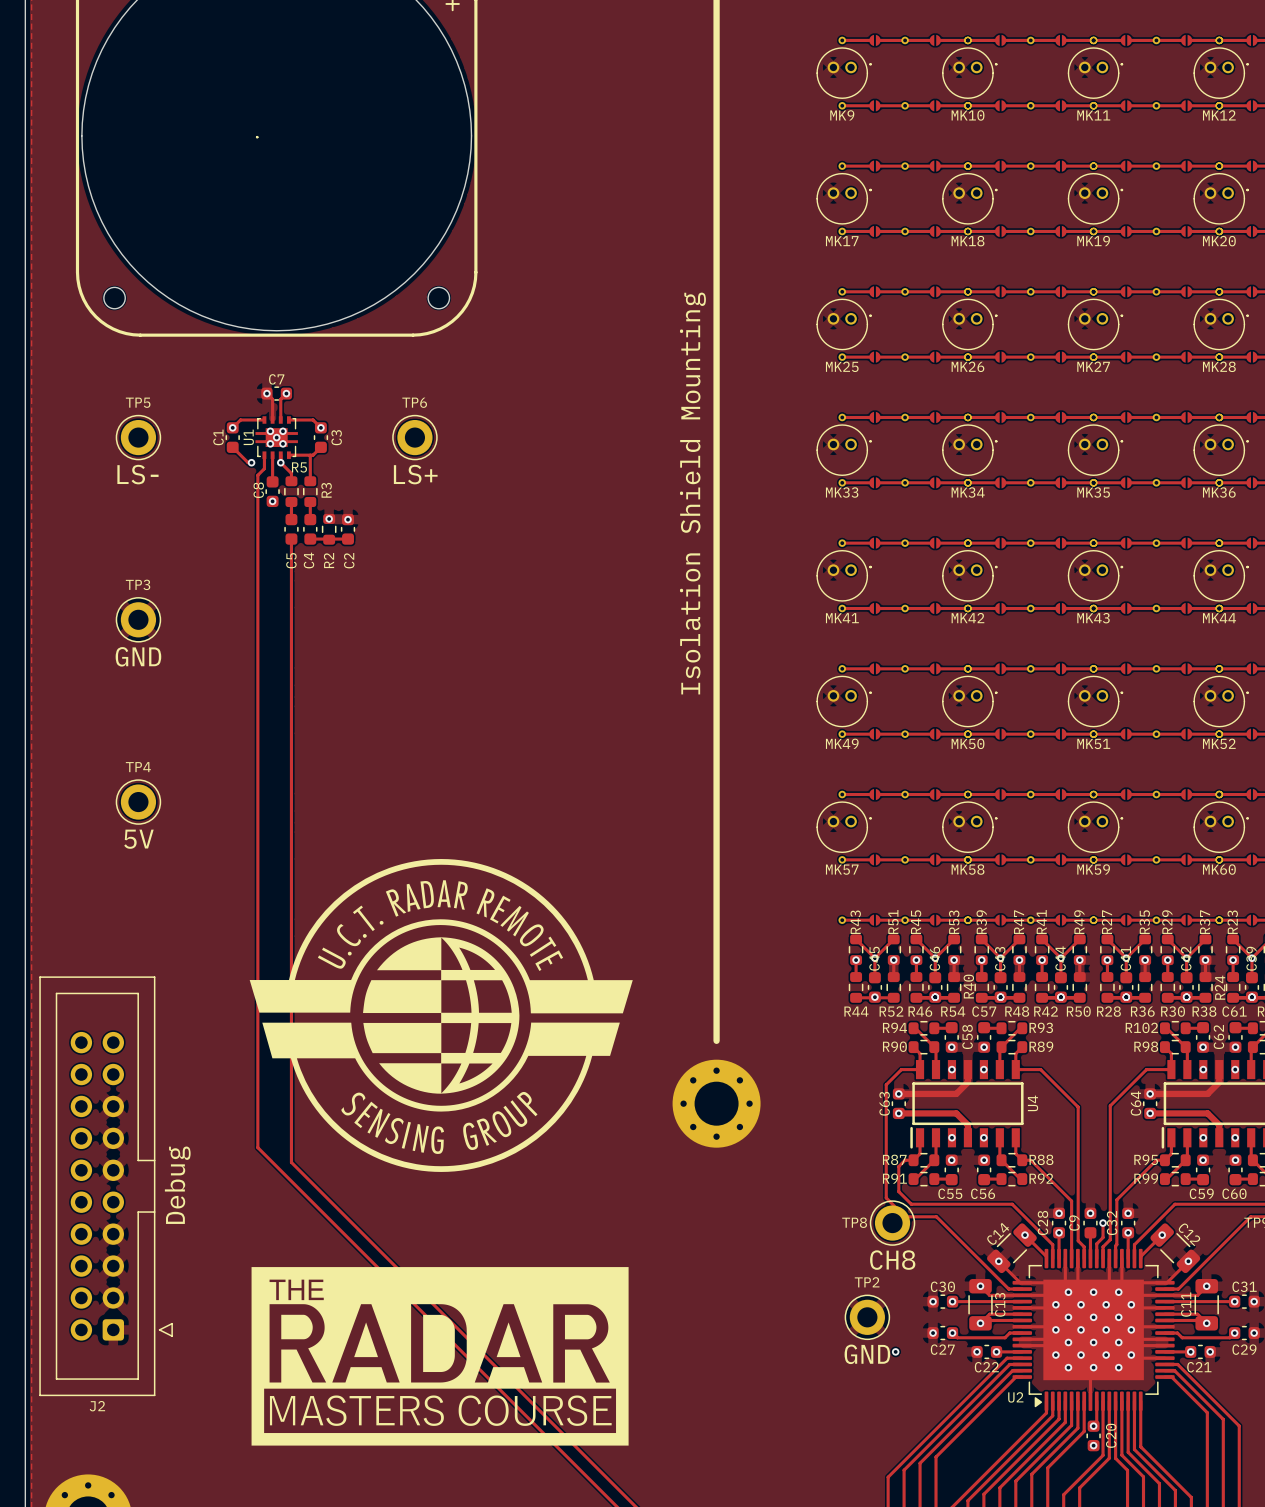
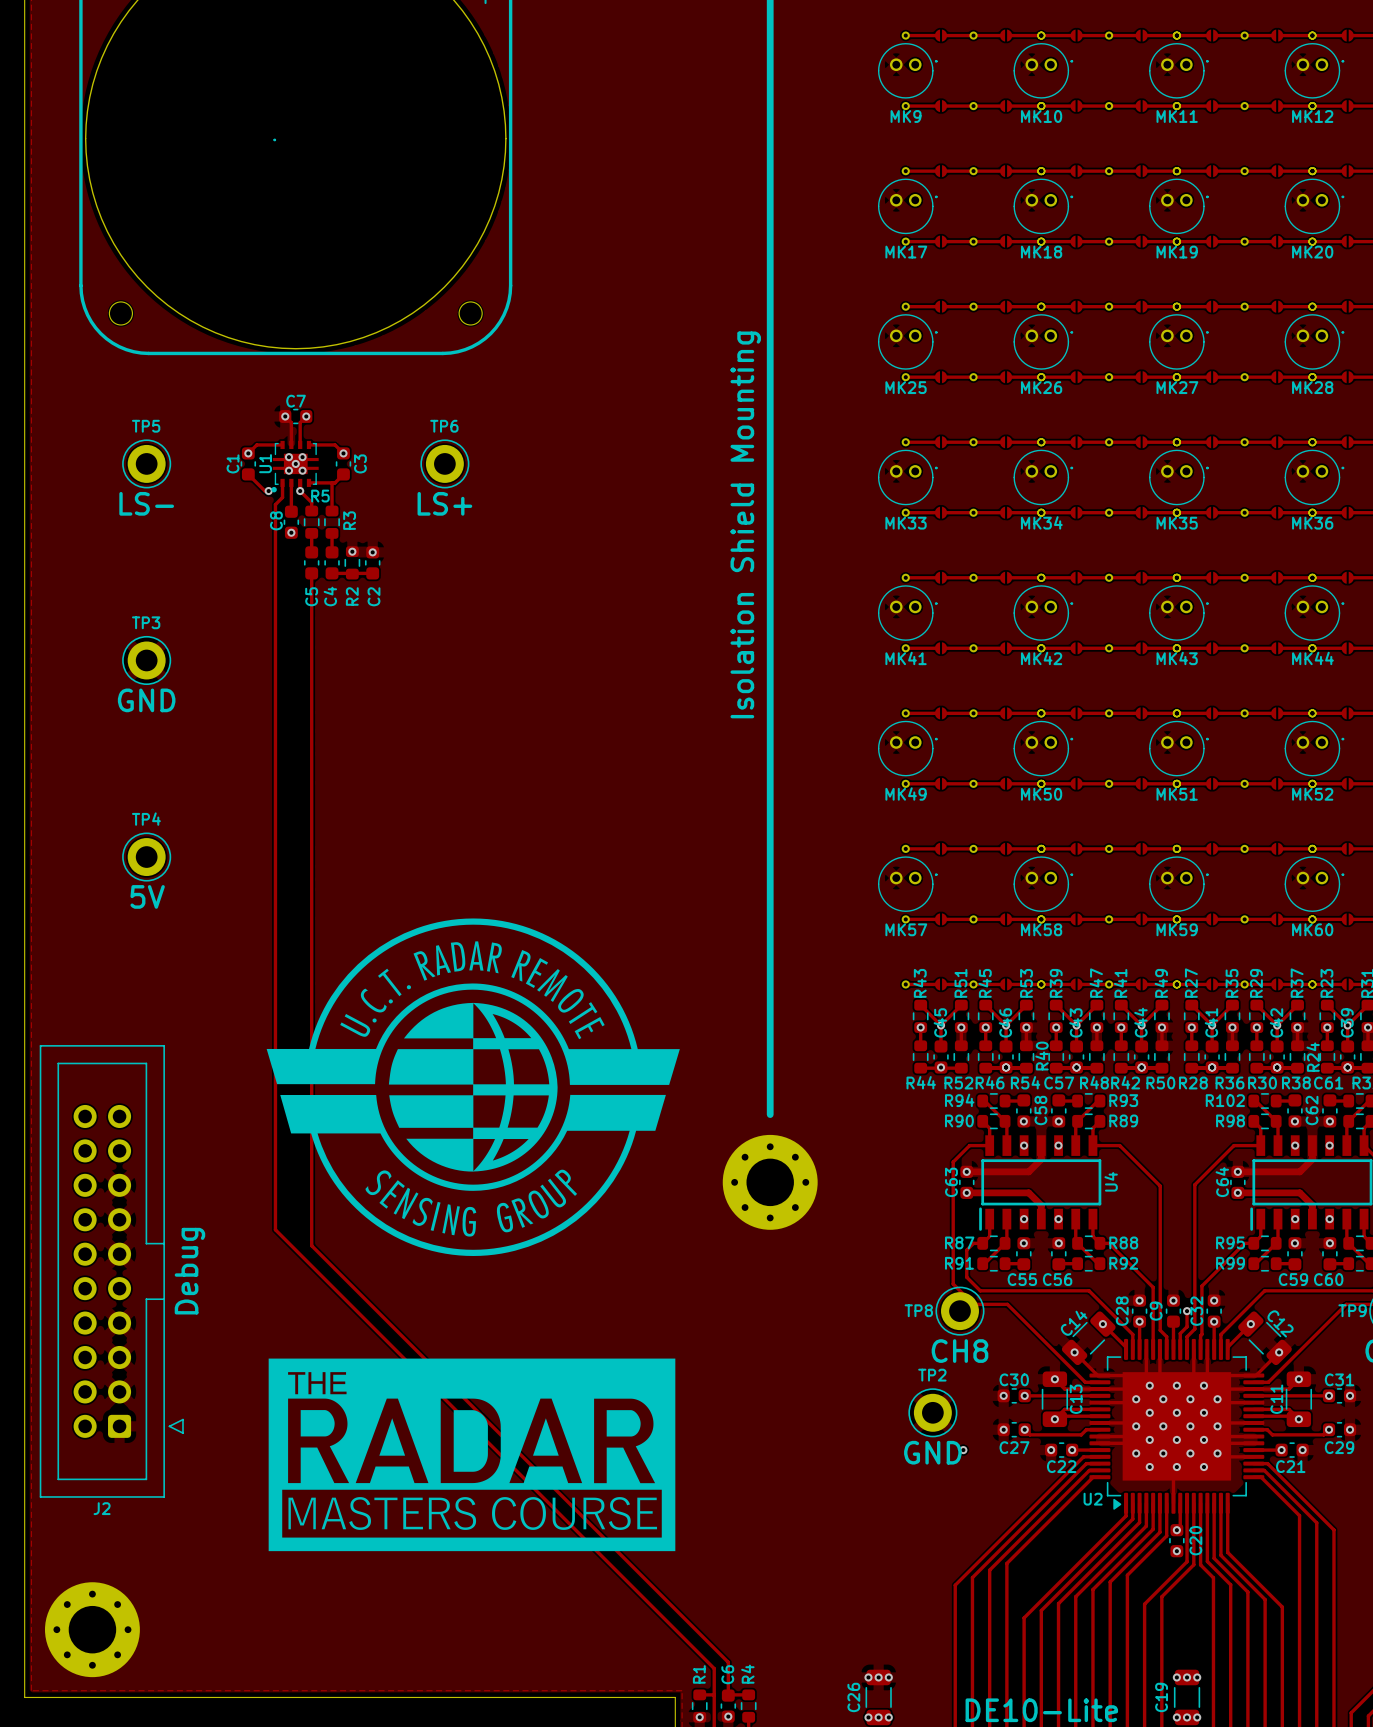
U1 footprint: [255, 416, 298, 459] -> [271, 440, 319, 493]

